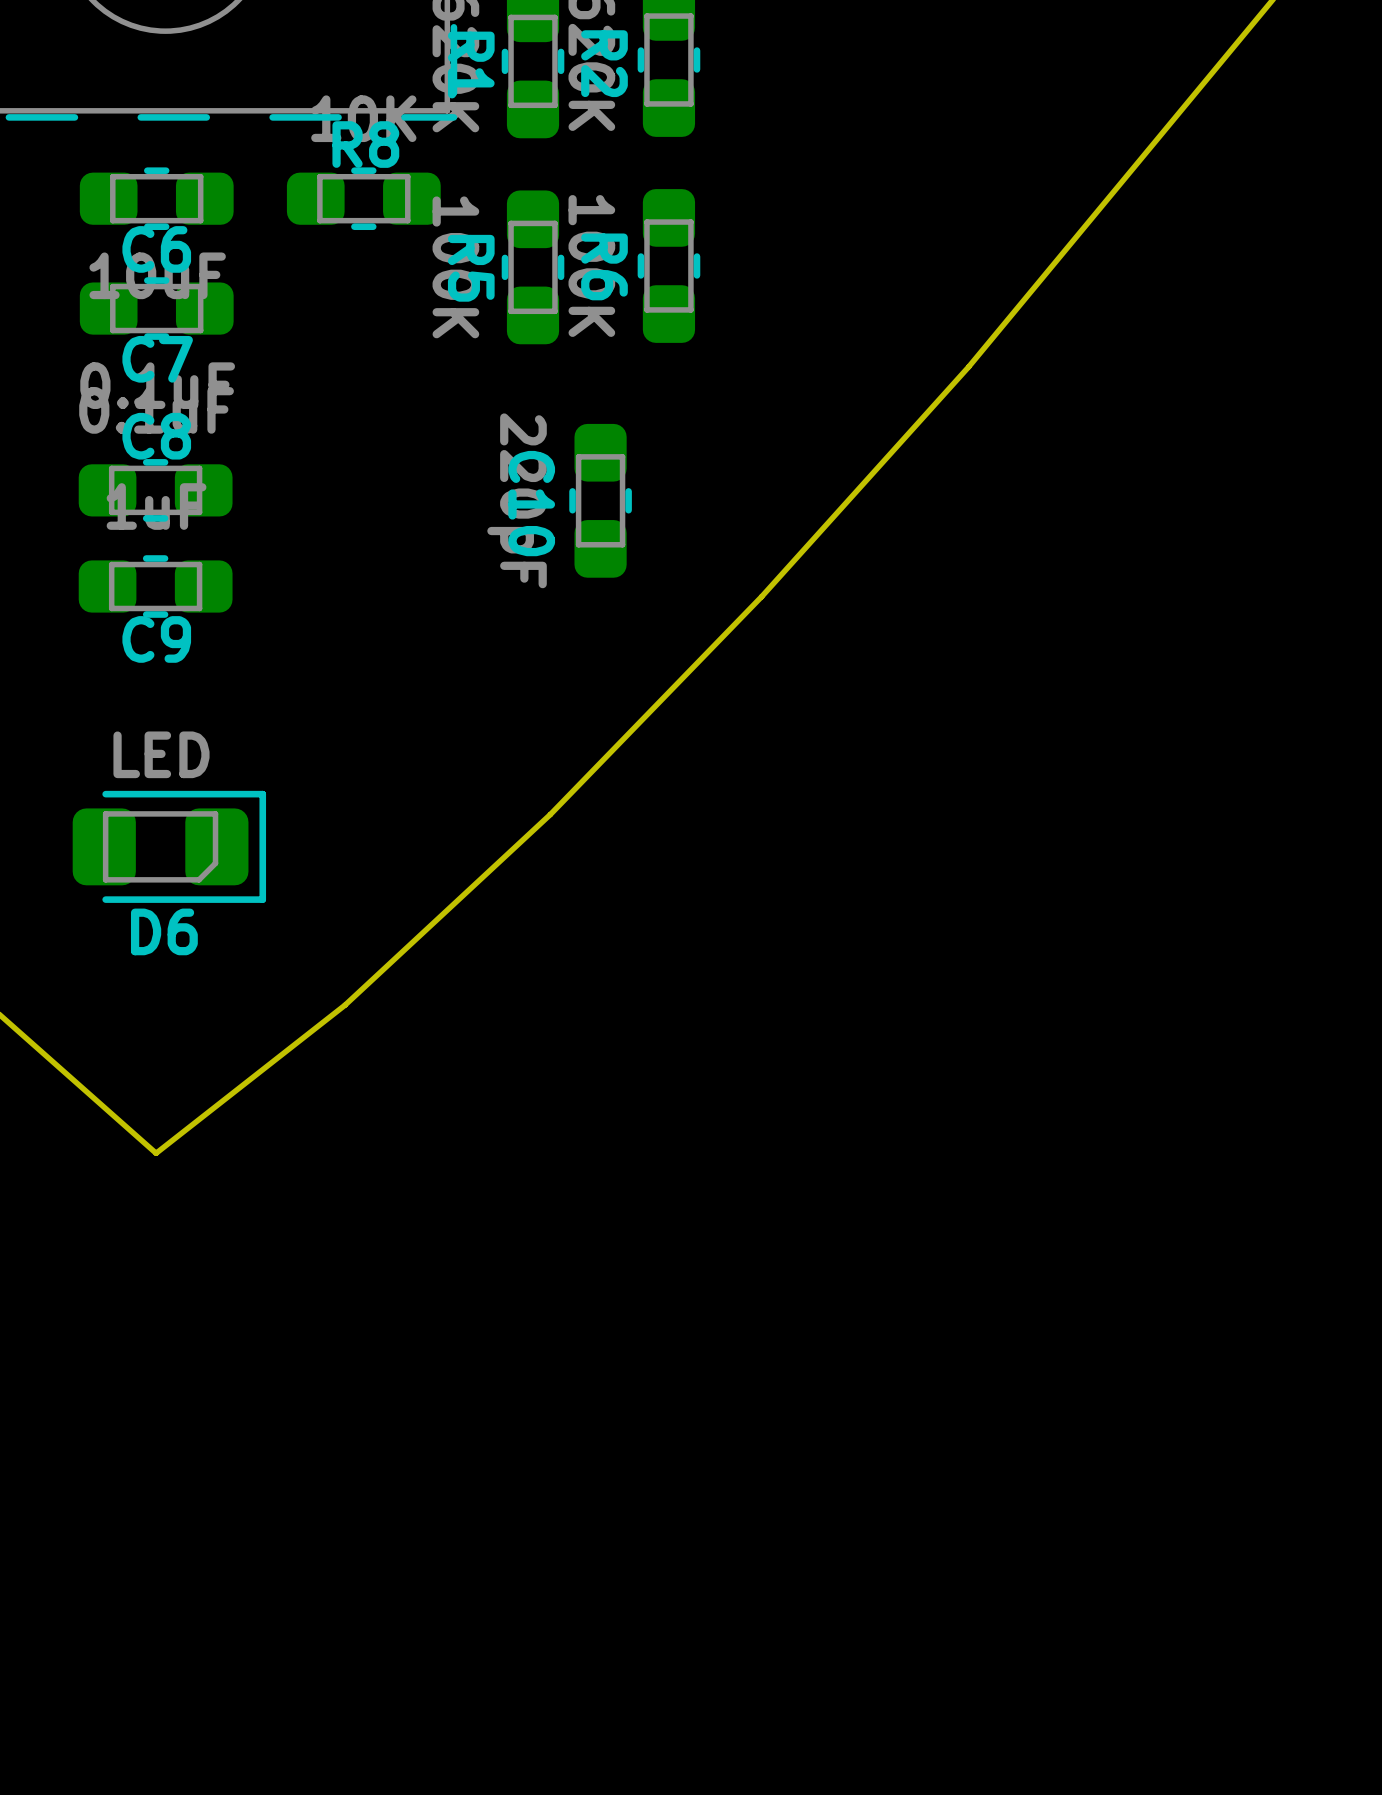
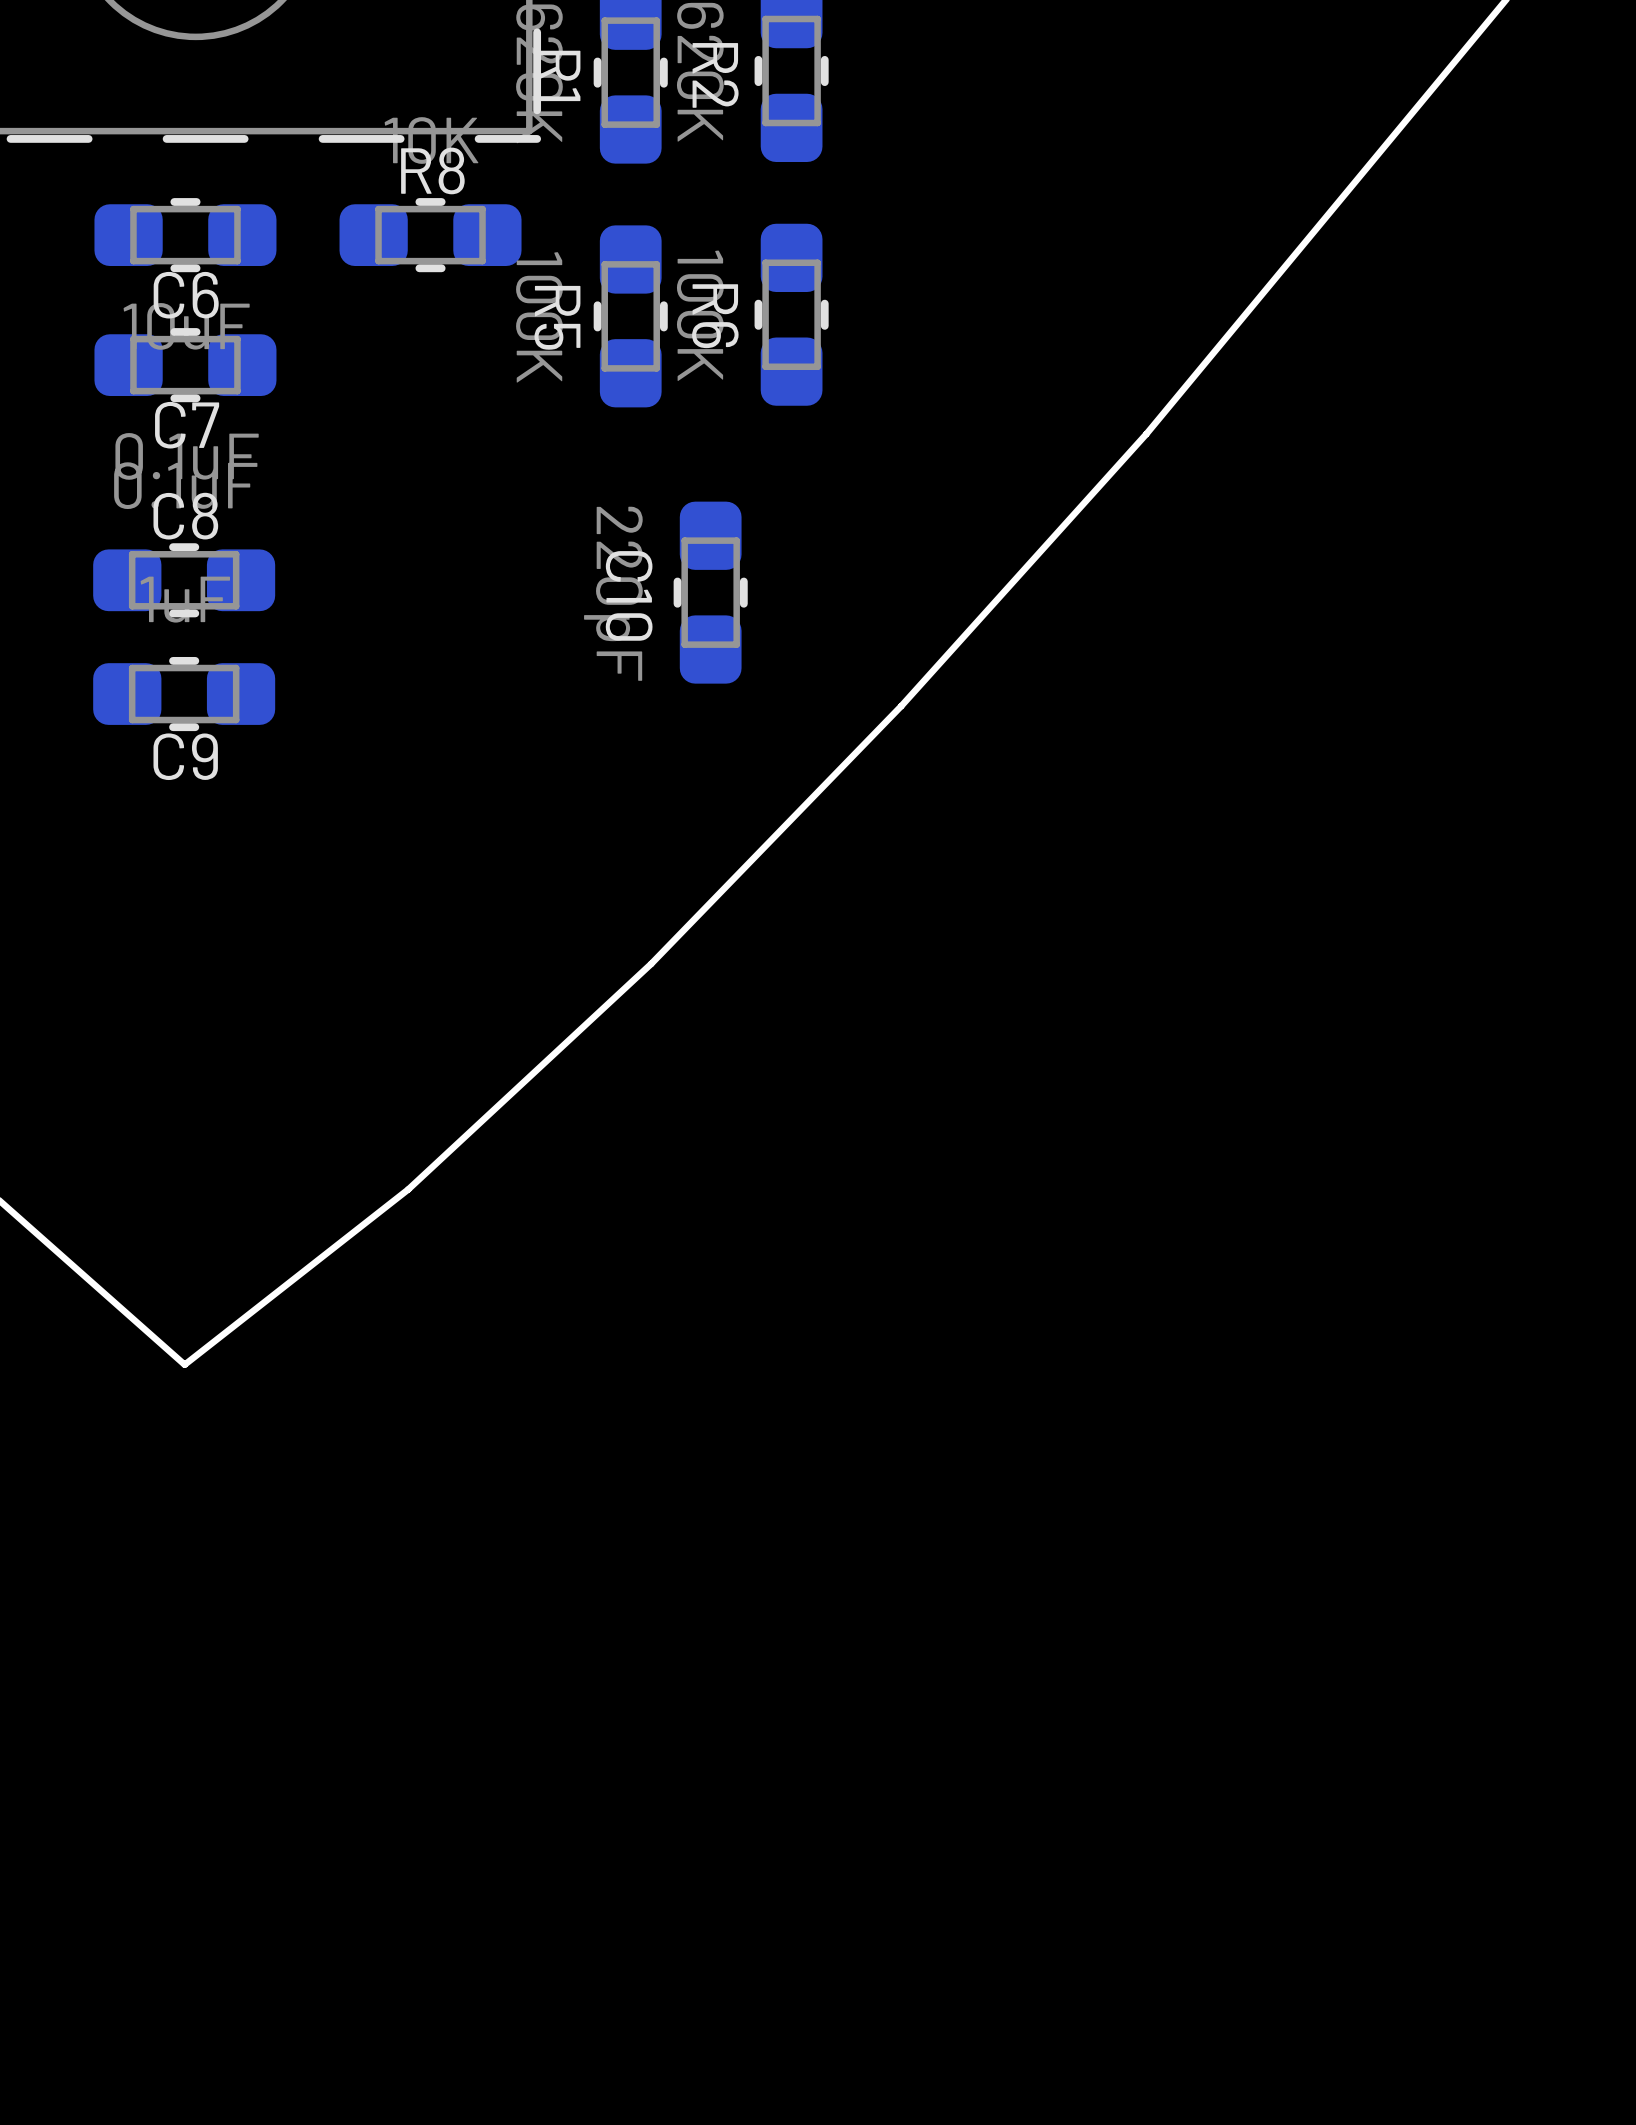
D6: LED (169, 846) -> none

